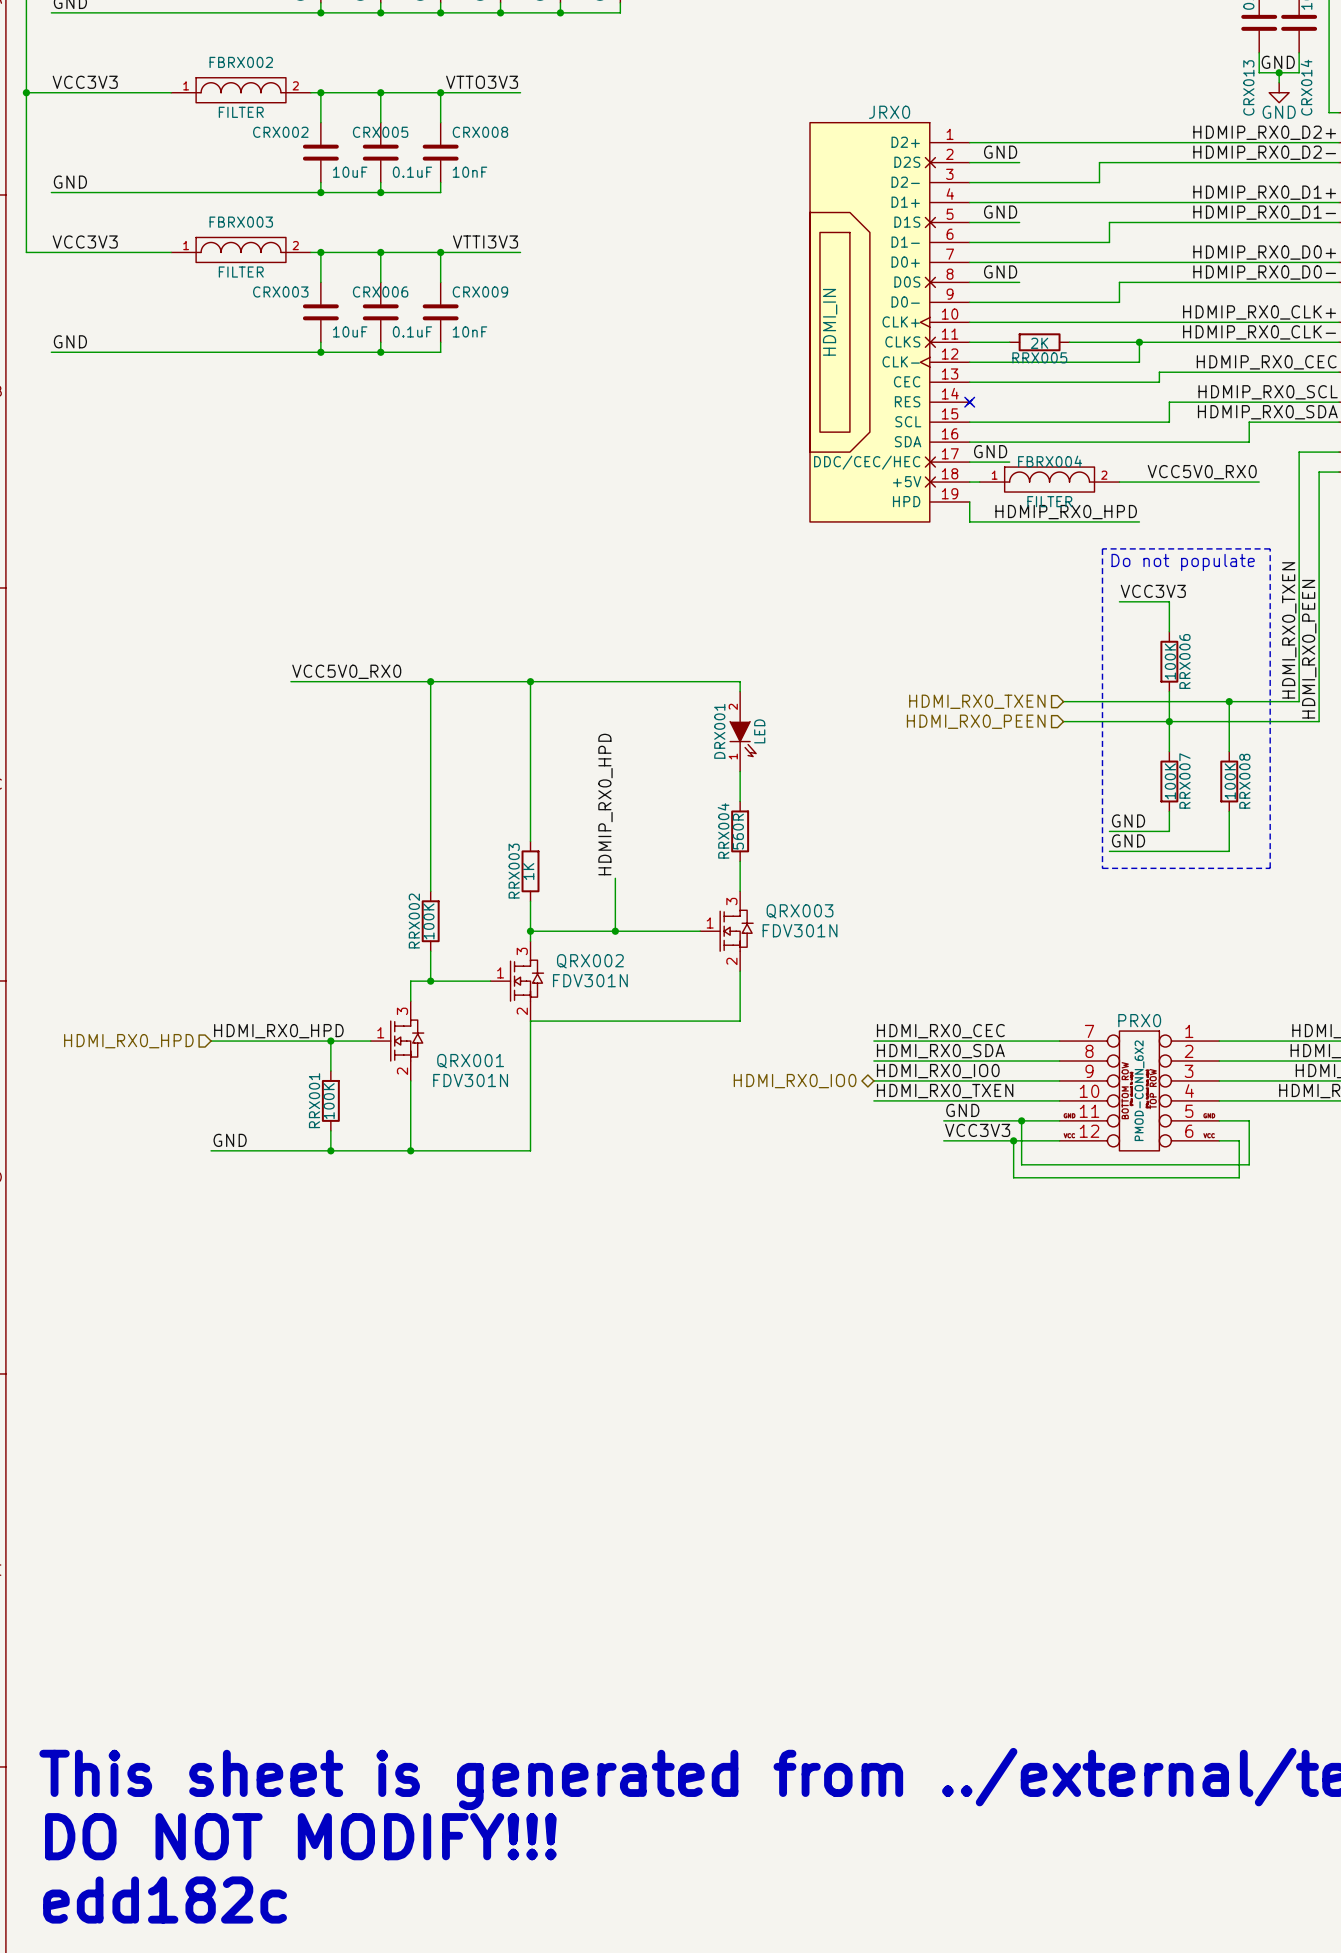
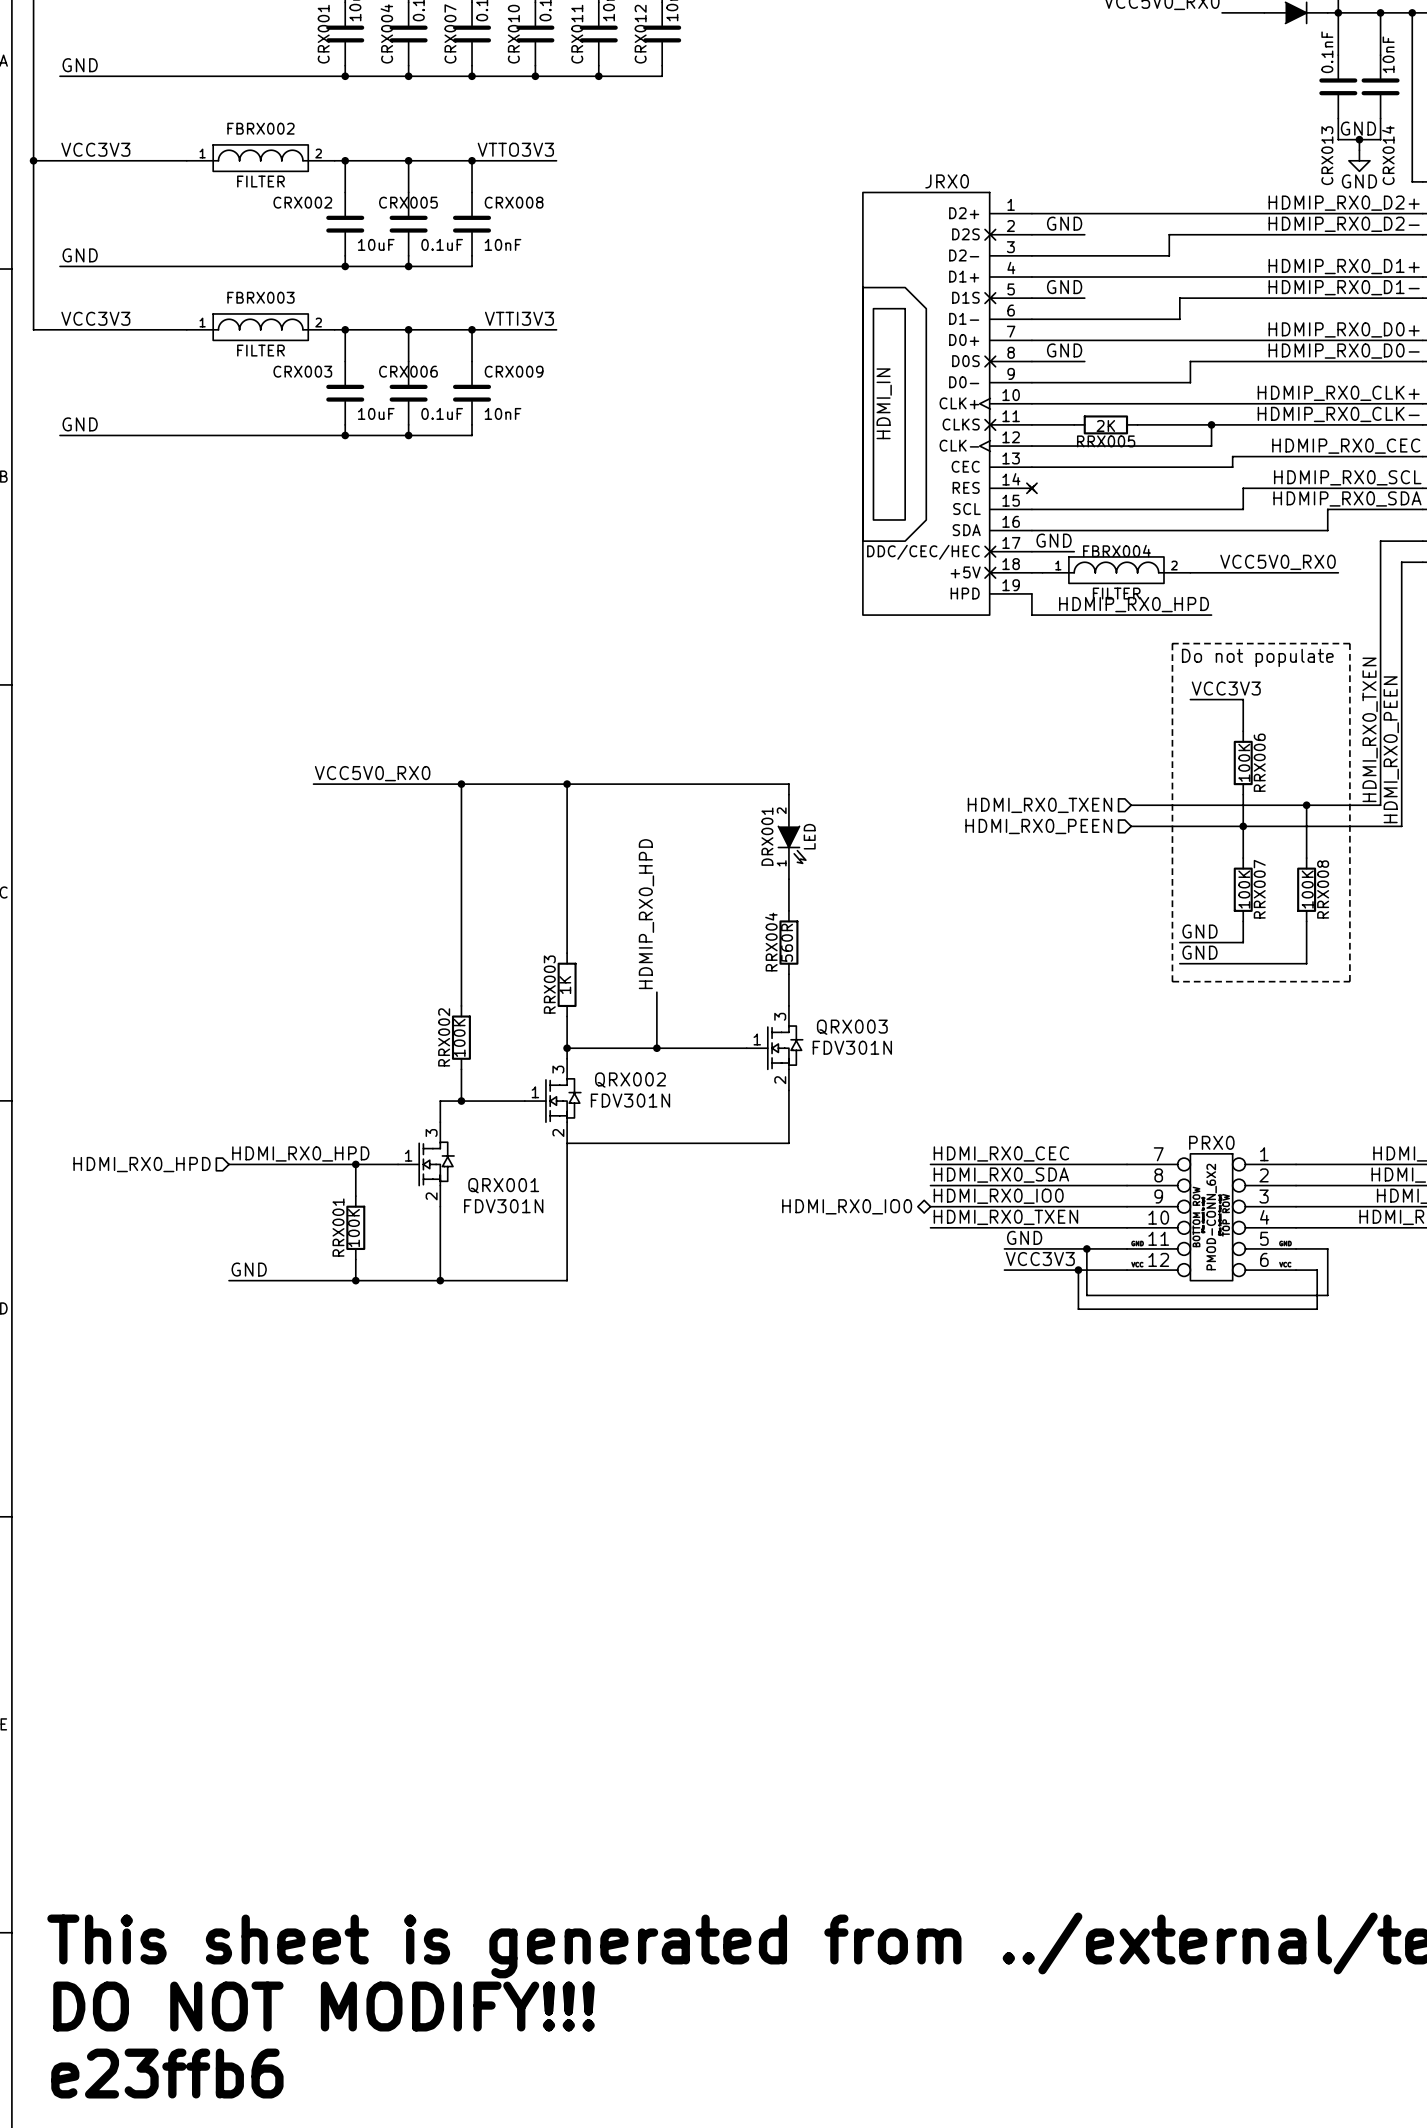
text: edd182c (165, 1900) -> e23ffb6 (167, 2073)

